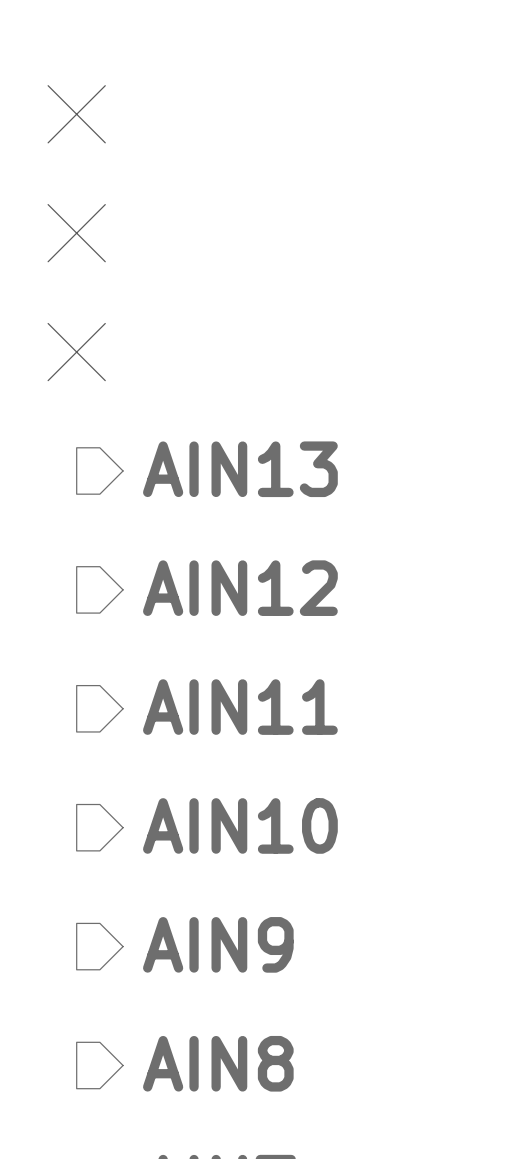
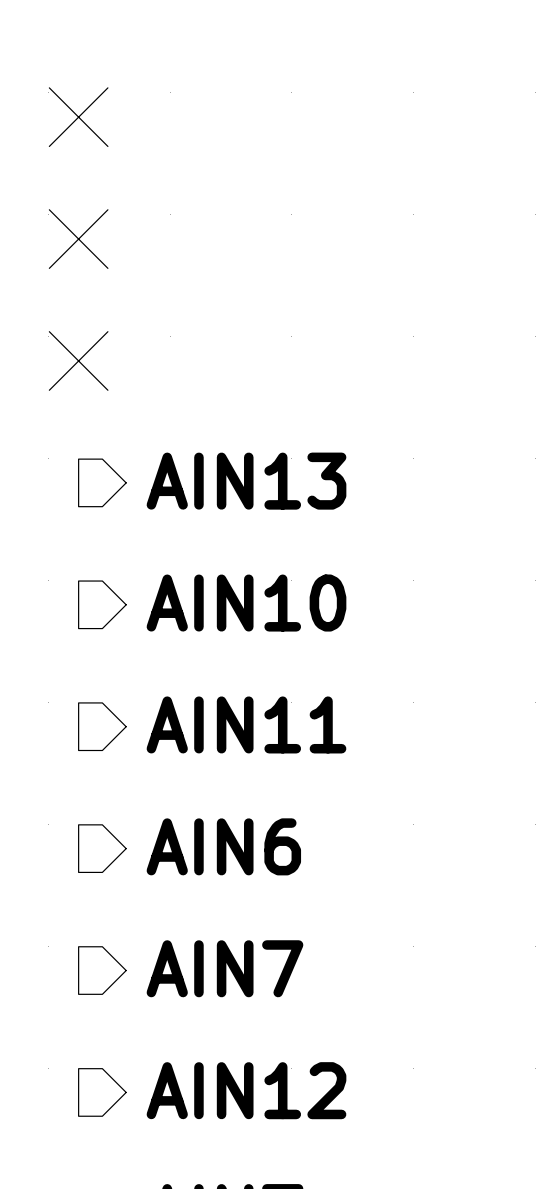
hierarchical label: AIN12 (240, 588) -> AIN10 (246, 603)
hierarchical label: AIN10 (240, 825) -> AIN6 (223, 846)
hierarchical label: AIN9 (218, 944) -> AIN7 (224, 968)
hierarchical label: AIN8 (218, 1063) -> AIN12 (246, 1090)

